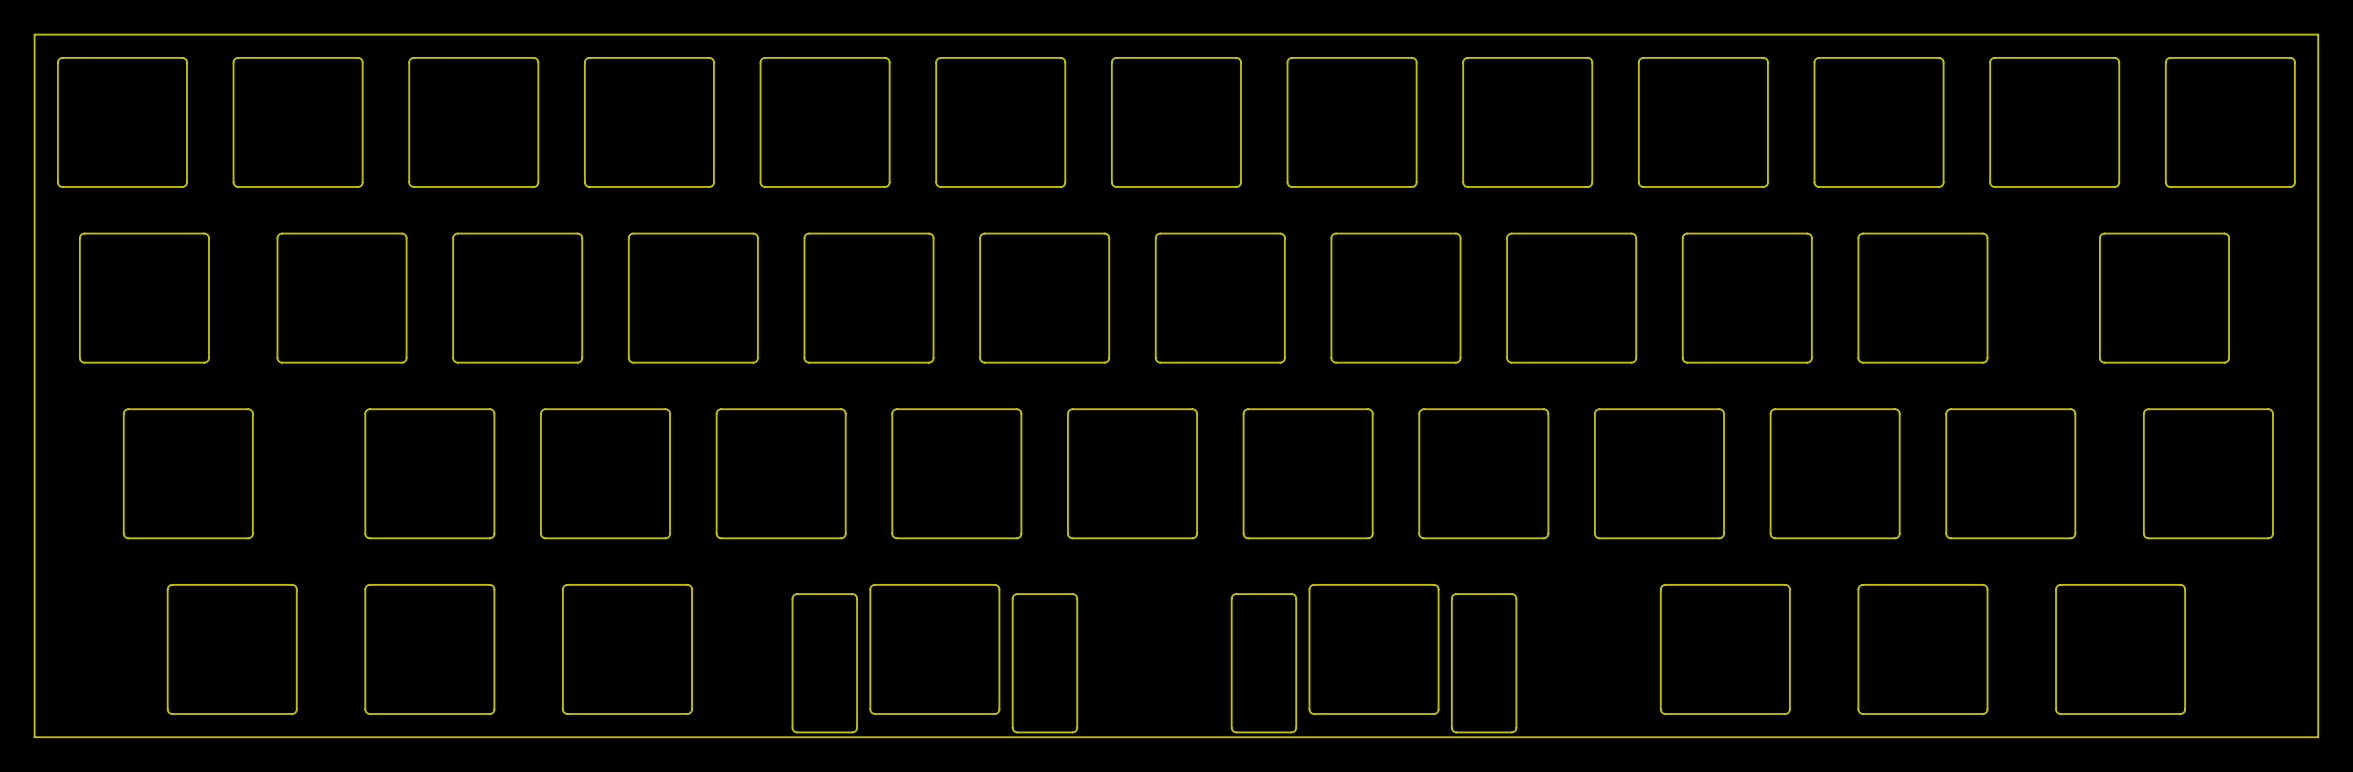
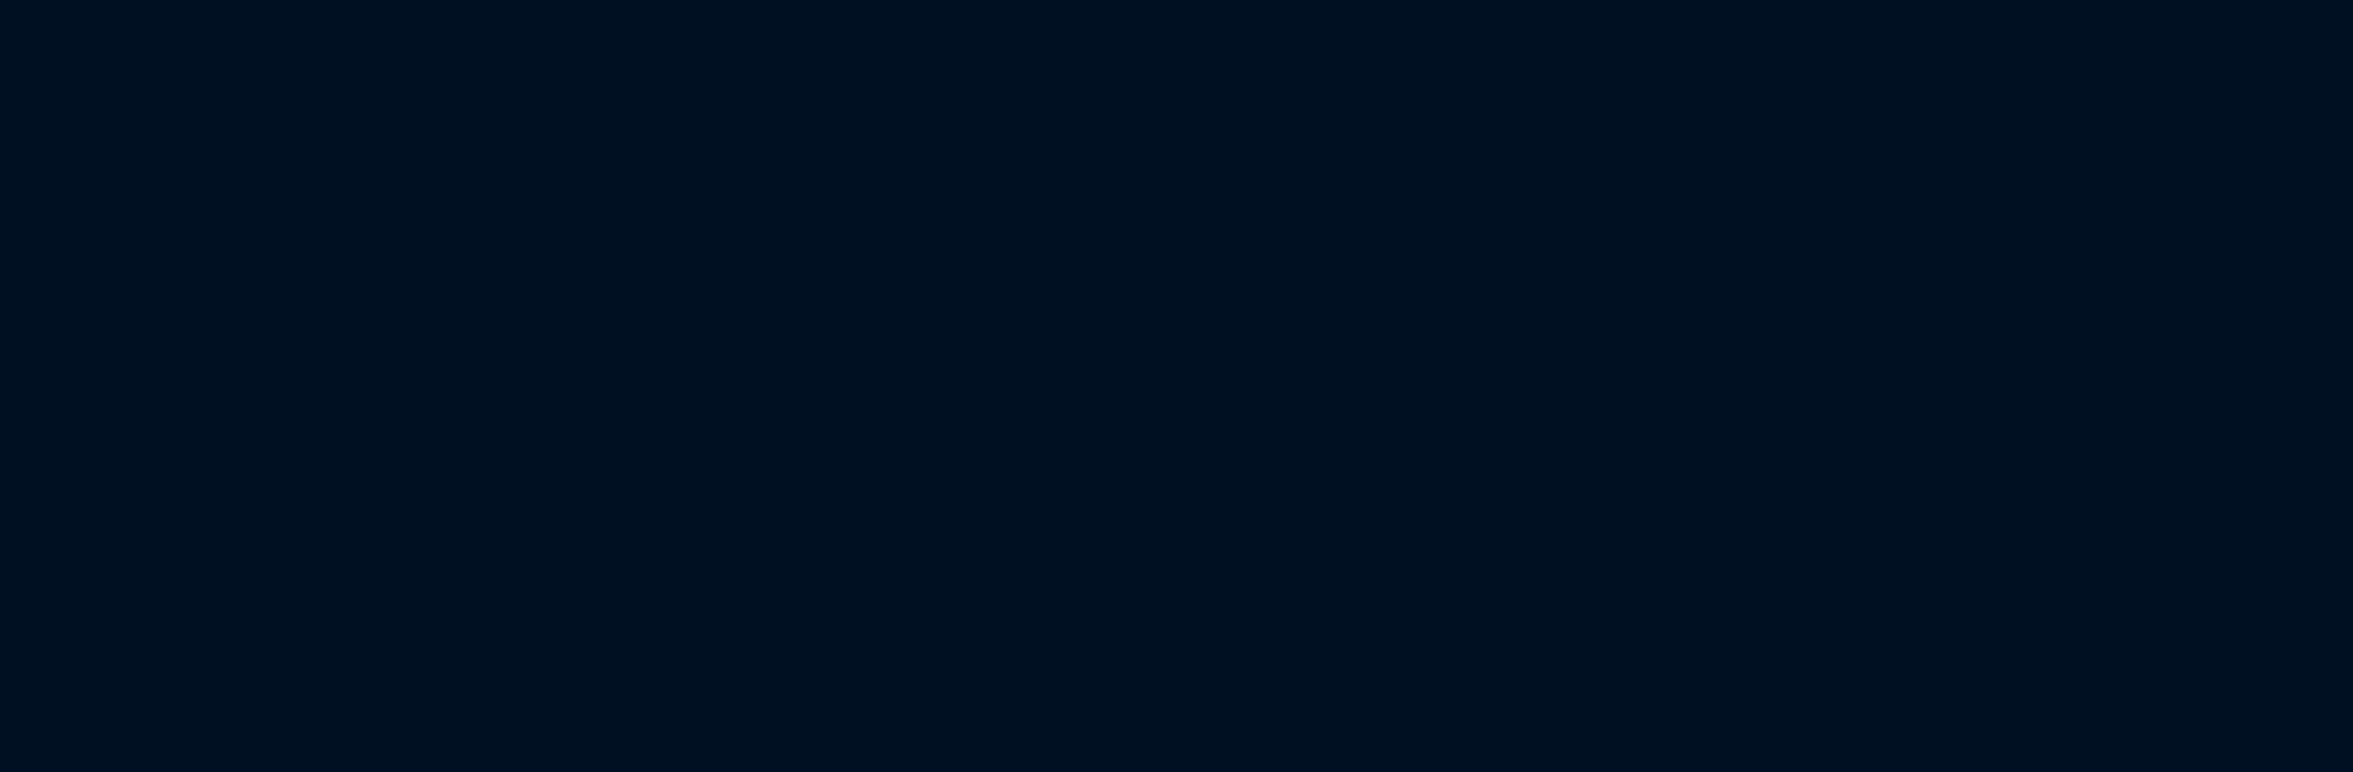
board edge: (34, 34) (34, 737) (2318, 737) (2318, 34) (34, 34) -> none
board edge: (62, 57) (185, 59) (185, 185) (59, 185) (57, 62) (62, 57) -> none
board edge: (238, 57) (361, 59) (361, 185) (234, 185) (233, 62) (238, 57) -> none
board edge: (413, 57) (536, 59) (536, 185) (410, 185) (409, 62) (413, 57) -> none
board edge: (589, 57) (712, 59) (712, 185) (586, 185) (584, 62) (589, 57) -> none
board edge: (765, 57) (888, 59) (888, 185) (761, 185) (760, 62) (765, 57) -> none
board edge: (940, 57) (1063, 59) (1063, 185) (937, 185) (936, 62) (940, 57) -> none
board edge: (1116, 57) (1239, 59) (1239, 185) (1113, 185) (1111, 62) (1116, 57) -> none
board edge: (1292, 57) (1415, 59) (1415, 185) (1288, 185) (1287, 62) (1292, 57) -> none
board edge: (1467, 57) (1590, 59) (1590, 185) (1464, 185) (1463, 62) (1467, 57) -> none
board edge: (1643, 57) (1766, 59) (1766, 185) (1640, 185) (1638, 62) (1643, 57) -> none
board edge: (1819, 57) (1942, 59) (1942, 185) (1815, 185) (1814, 62) (1819, 57) -> none
board edge: (1994, 57) (2117, 59) (2117, 185) (1991, 185) (1990, 62) (1994, 57) -> none
board edge: (2170, 57) (2293, 59) (2293, 185) (2167, 185) (2165, 62) (2170, 57) -> none
board edge: (84, 233) (207, 234) (207, 361) (81, 361) (79, 238) (84, 233) -> none
board edge: (282, 233) (405, 234) (405, 361) (278, 361) (277, 238) (282, 233) -> none
board edge: (457, 233) (580, 234) (580, 361) (454, 361) (453, 238) (457, 233) -> none
board edge: (633, 233) (756, 234) (756, 361) (630, 361) (628, 238) (633, 233) -> none
board edge: (809, 233) (932, 234) (932, 361) (805, 361) (804, 238) (809, 233) -> none
board edge: (984, 233) (1107, 234) (1107, 361) (981, 361) (980, 238) (984, 233) -> none
board edge: (1160, 233) (1283, 234) (1283, 361) (1157, 361) (1155, 238) (1160, 233) -> none
board edge: (1336, 233) (1459, 234) (1459, 361) (1332, 361) (1331, 238) (1336, 233) -> none
board edge: (1511, 233) (1634, 234) (1634, 361) (1508, 361) (1507, 238) (1511, 233) -> none
board edge: (1687, 233) (1810, 234) (1810, 361) (1684, 361) (1682, 238) (1687, 233) -> none
board edge: (1863, 233) (1986, 234) (1986, 361) (1859, 361) (1858, 238) (1863, 233) -> none
board edge: (2104, 233) (2227, 234) (2227, 361) (2101, 361) (2099, 238) (2104, 233) -> none
board edge: (128, 409) (251, 410) (251, 536) (125, 536) (123, 413) (128, 409) -> none
board edge: (369, 409) (493, 410) (493, 536) (366, 536) (365, 413) (369, 409) -> none
board edge: (545, 409) (668, 410) (668, 536) (542, 536) (540, 413) (545, 409) -> none
board edge: (721, 409) (844, 410) (844, 536) (717, 536) (716, 413) (721, 409) -> none
board edge: (896, 409) (1020, 410) (1020, 536) (893, 536) (892, 413) (896, 409) -> none
board edge: (1072, 409) (1195, 410) (1195, 536) (1069, 536) (1067, 413) (1072, 409) -> none
board edge: (1248, 409) (1371, 410) (1371, 536) (1244, 536) (1243, 413) (1248, 409) -> none
board edge: (1423, 409) (1547, 410) (1547, 536) (1420, 536) (1419, 413) (1423, 409) -> none
board edge: (1599, 409) (1722, 410) (1722, 536) (1596, 536) (1594, 413) (1599, 409) -> none
board edge: (1775, 409) (1898, 410) (1898, 536) (1771, 536) (1770, 413) (1775, 409) -> none
board edge: (1950, 409) (2073, 410) (2073, 536) (1947, 536) (1946, 413) (1950, 409) -> none
board edge: (2148, 409) (2271, 410) (2271, 536) (2145, 536) (2143, 413) (2148, 409) -> none
board edge: (172, 584) (295, 586) (295, 712) (169, 712) (167, 589) (172, 584) -> none
board edge: (369, 584) (493, 586) (493, 712) (366, 712) (365, 589) (369, 584) -> none
board edge: (567, 584) (690, 586) (690, 712) (564, 712) (562, 589) (567, 584) -> none
board edge: (874, 584) (998, 586) (998, 712) (871, 712) (870, 589) (874, 584) -> none
board edge: (1314, 584) (1437, 586) (1437, 712) (1310, 712) (1309, 589) (1314, 584) -> none
board edge: (1665, 584) (1788, 586) (1788, 712) (1662, 712) (1660, 589) (1665, 584) -> none
board edge: (1863, 584) (1986, 586) (1986, 712) (1859, 712) (1858, 589) (1863, 584) -> none
board edge: (2060, 584) (2183, 586) (2183, 712) (2057, 712) (2056, 589) (2060, 584) -> none
board edge: (797, 594) (852, 594) (856, 596) (857, 727) (853, 732) (797, 732) (792, 729) (792, 598) (797, 594) -> none
board edge: (1017, 594) (1072, 594) (1076, 596) (1077, 727) (1074, 732) (1017, 732) (1013, 729) (1012, 598) (1017, 594) -> none
board edge: (1236, 594) (1291, 594) (1295, 596) (1296, 727) (1293, 732) (1236, 732) (1232, 729) (1231, 598) (1236, 594) -> none
board edge: (1456, 594) (1511, 594) (1515, 596) (1516, 727) (1513, 732) (1456, 732) (1452, 729) (1451, 598) (1456, 594) -> none

